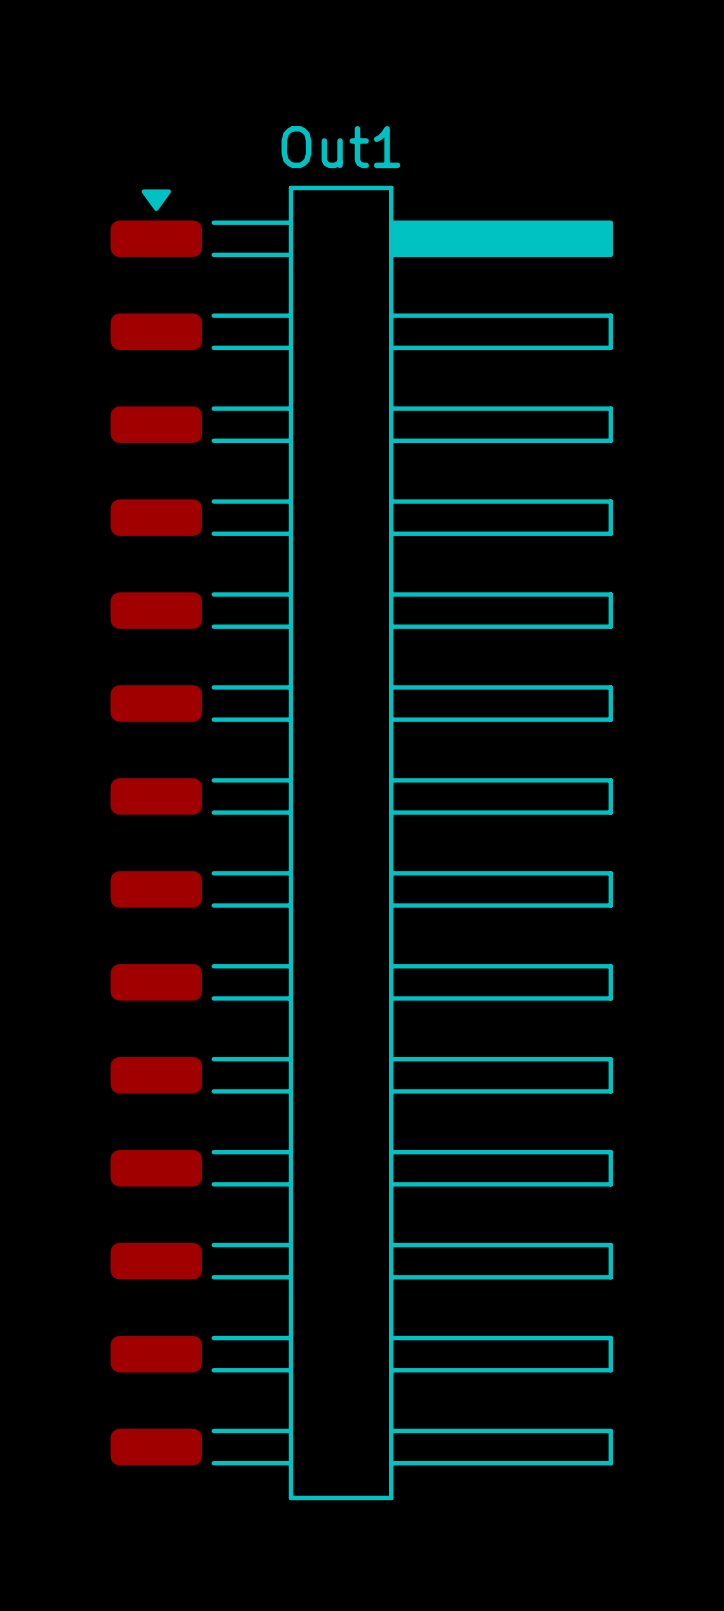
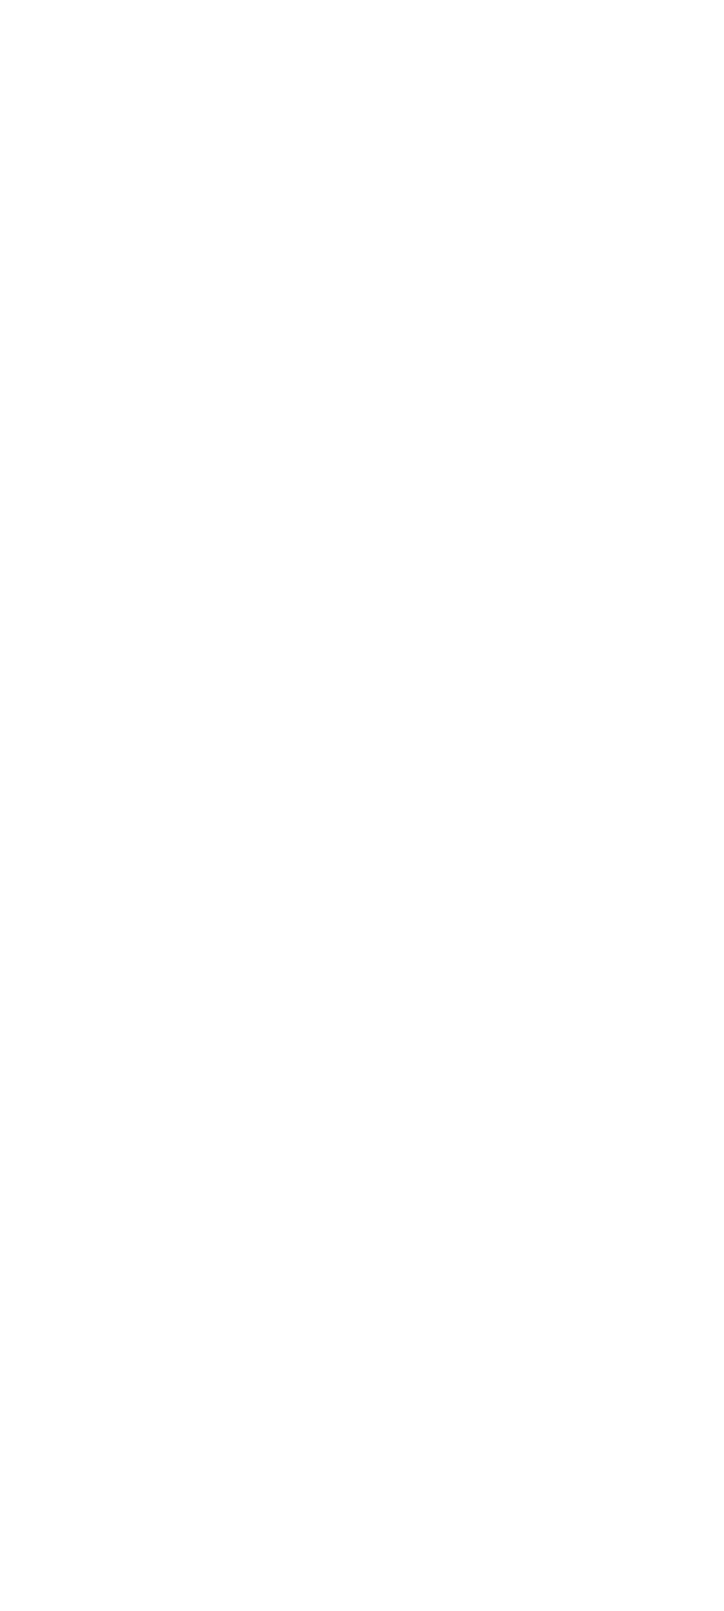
Out1: (361, 842) -> none

